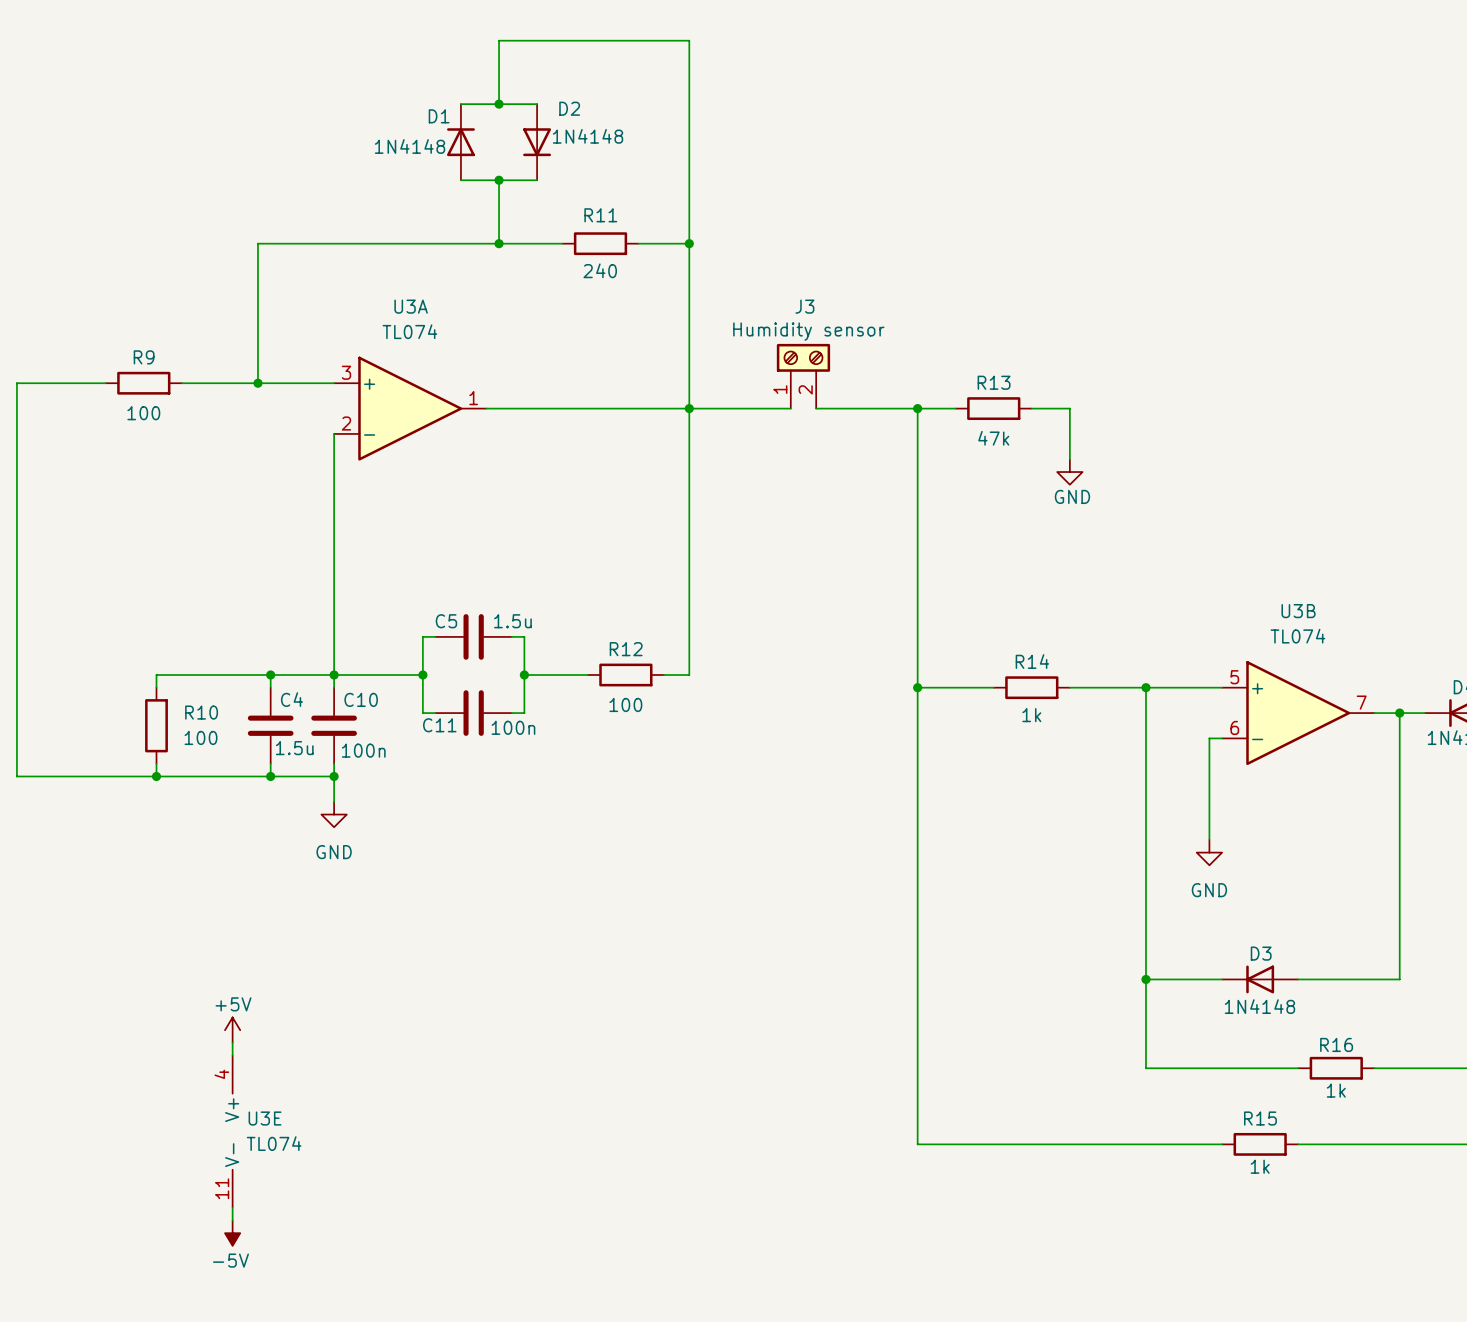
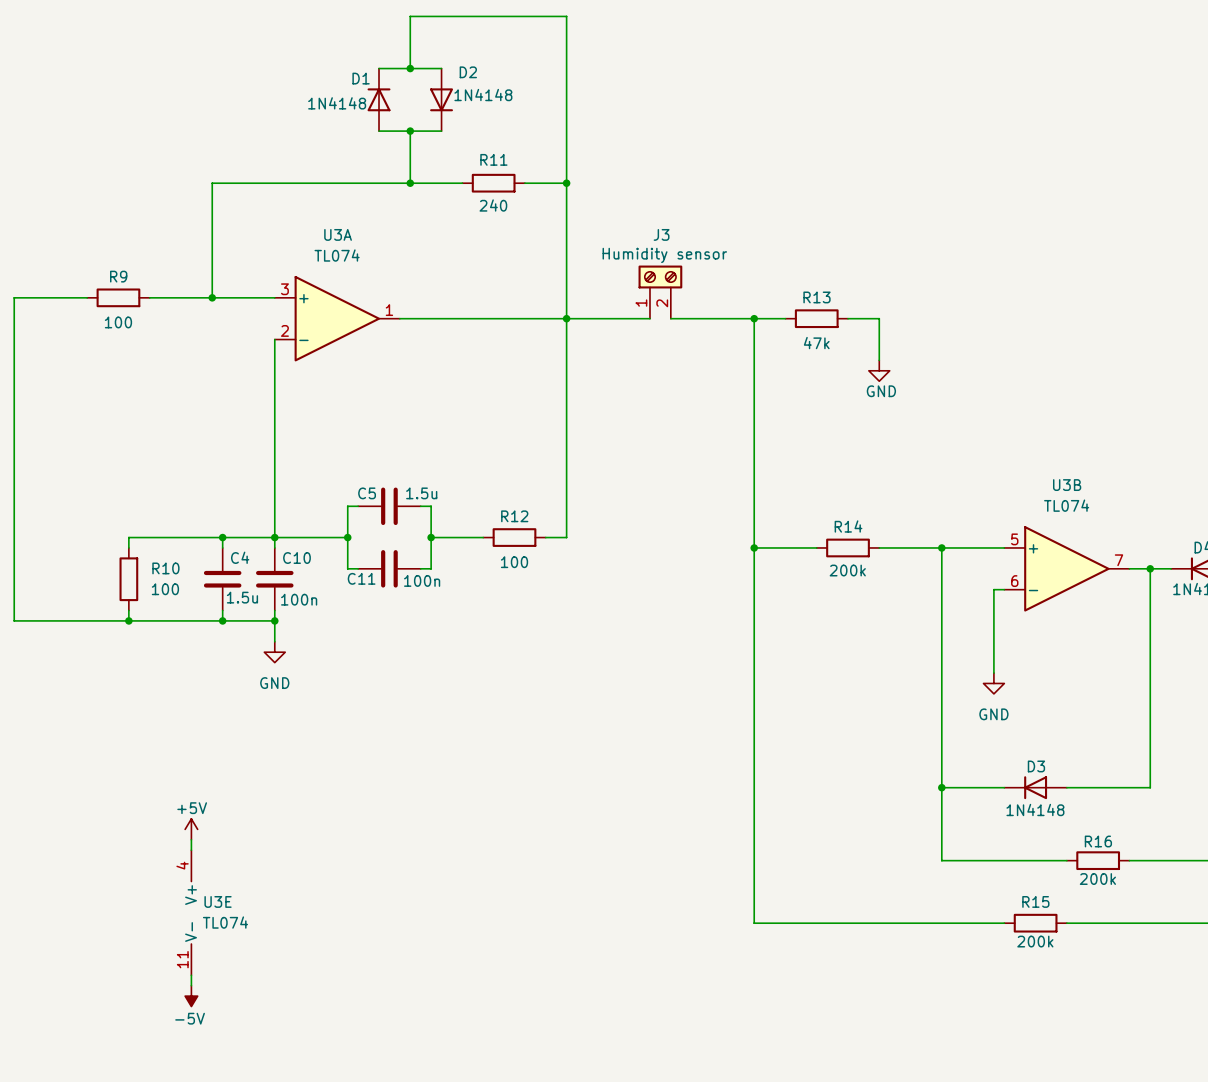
R14 value: 1k (1031, 715) -> 200k (847, 570)
R16 value: 1k (1336, 1090) -> 200k (1097, 879)
R15 value: 1k (1260, 1166) -> 200k (1035, 941)

